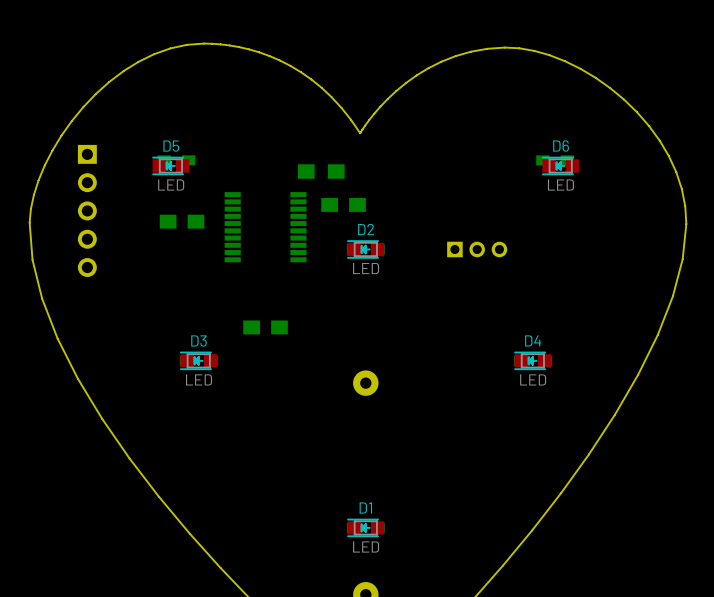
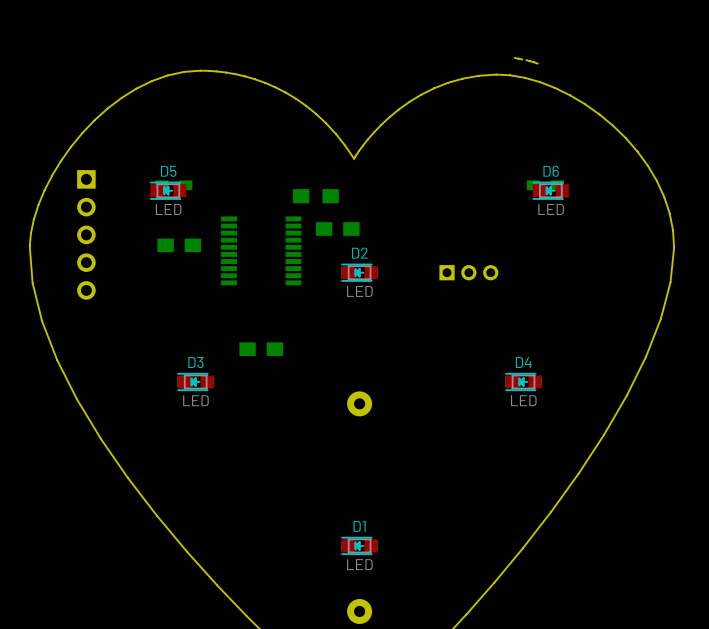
board edge: none -> (514, 57) (518, 58)
board edge: none -> (518, 58) (522, 59)
board edge: none -> (526, 60) (530, 61)
board edge: none -> (530, 61) (533, 62)
board edge: none -> (534, 62) (537, 63)

